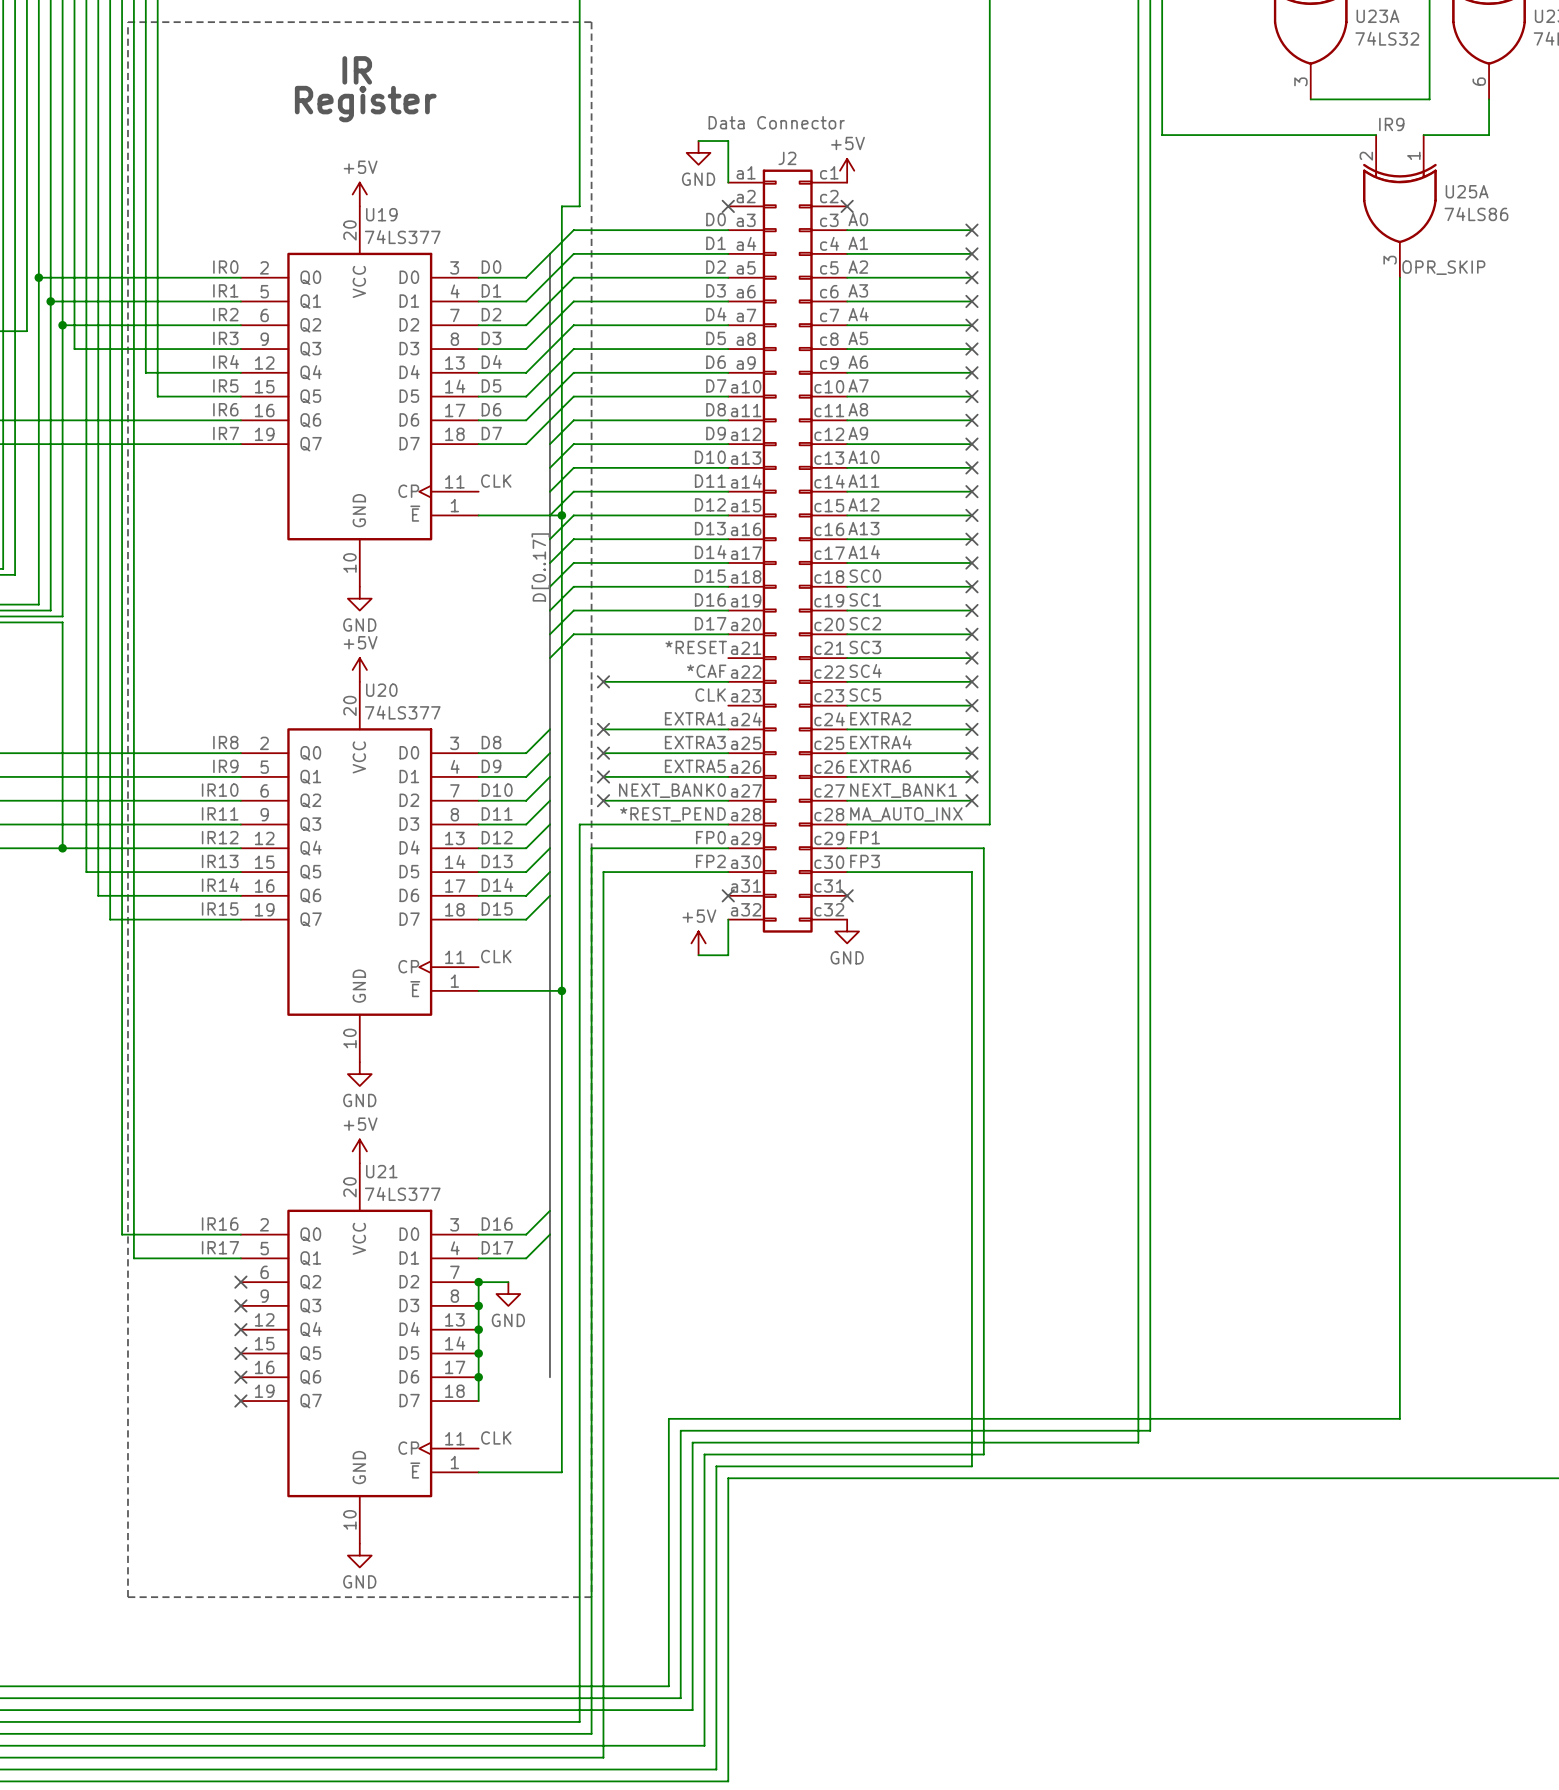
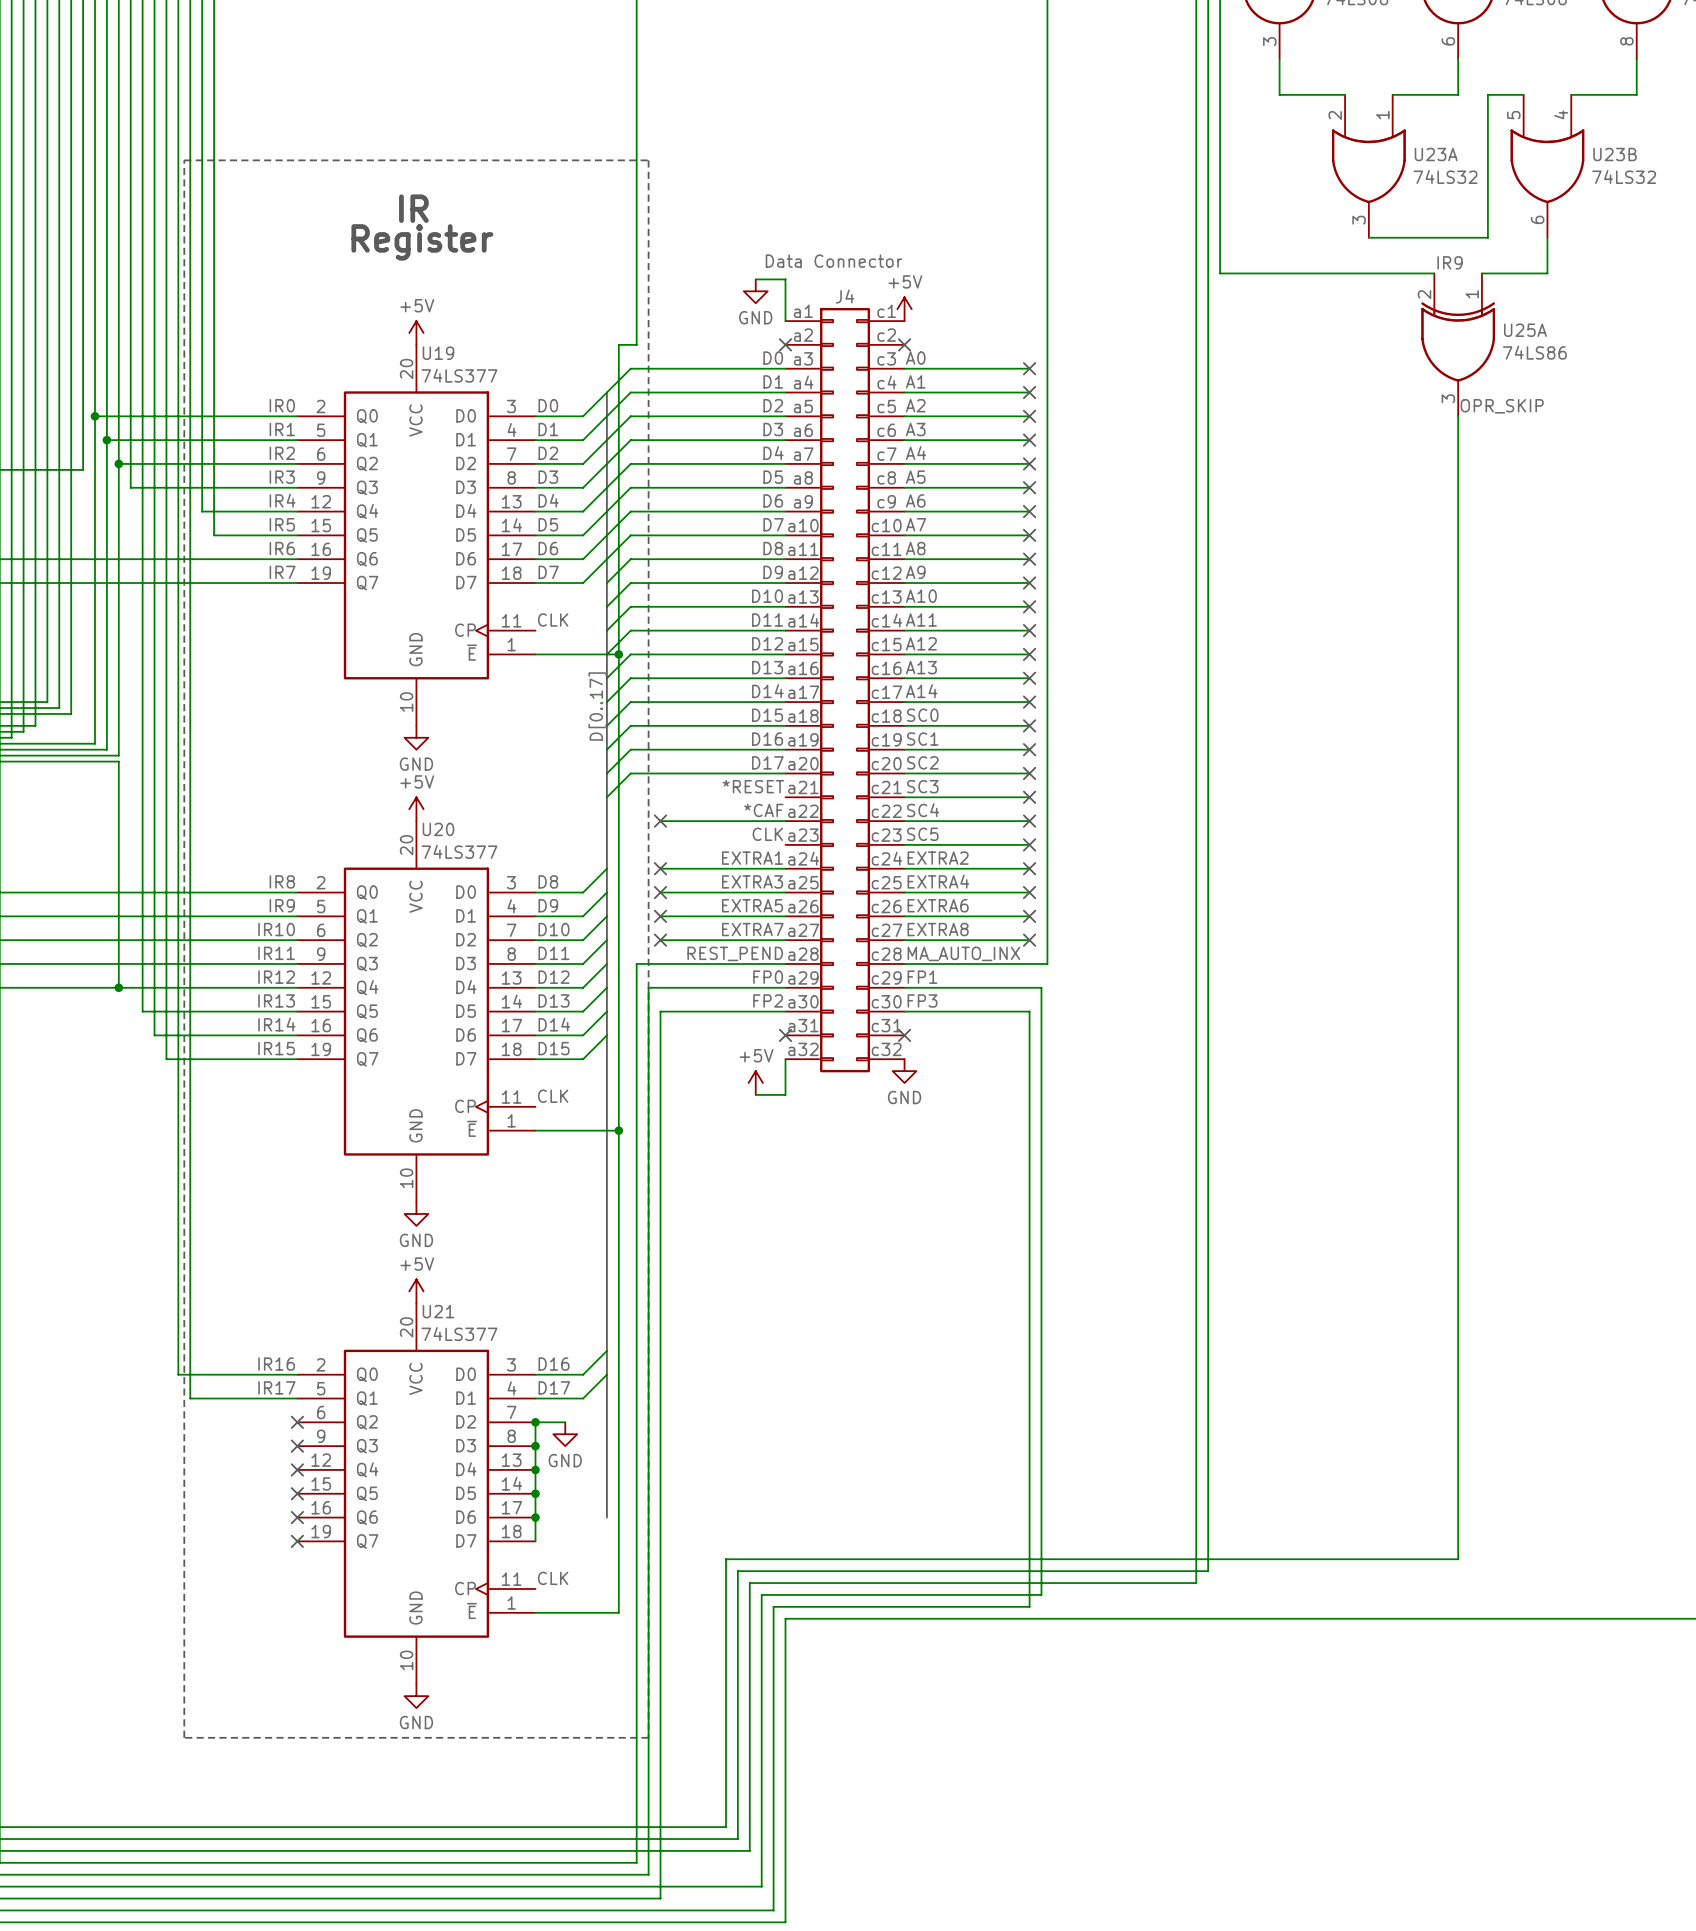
J2 name: J2 (787, 158) -> J4 (845, 296)
label: NEXT_BANK0 (672, 790) -> EXTRA7 (752, 929)
label: NEXT_BANK1 (903, 790) -> EXTRA8 (938, 929)
label: *REST_PEND (673, 814) -> REST_PEND (735, 953)

